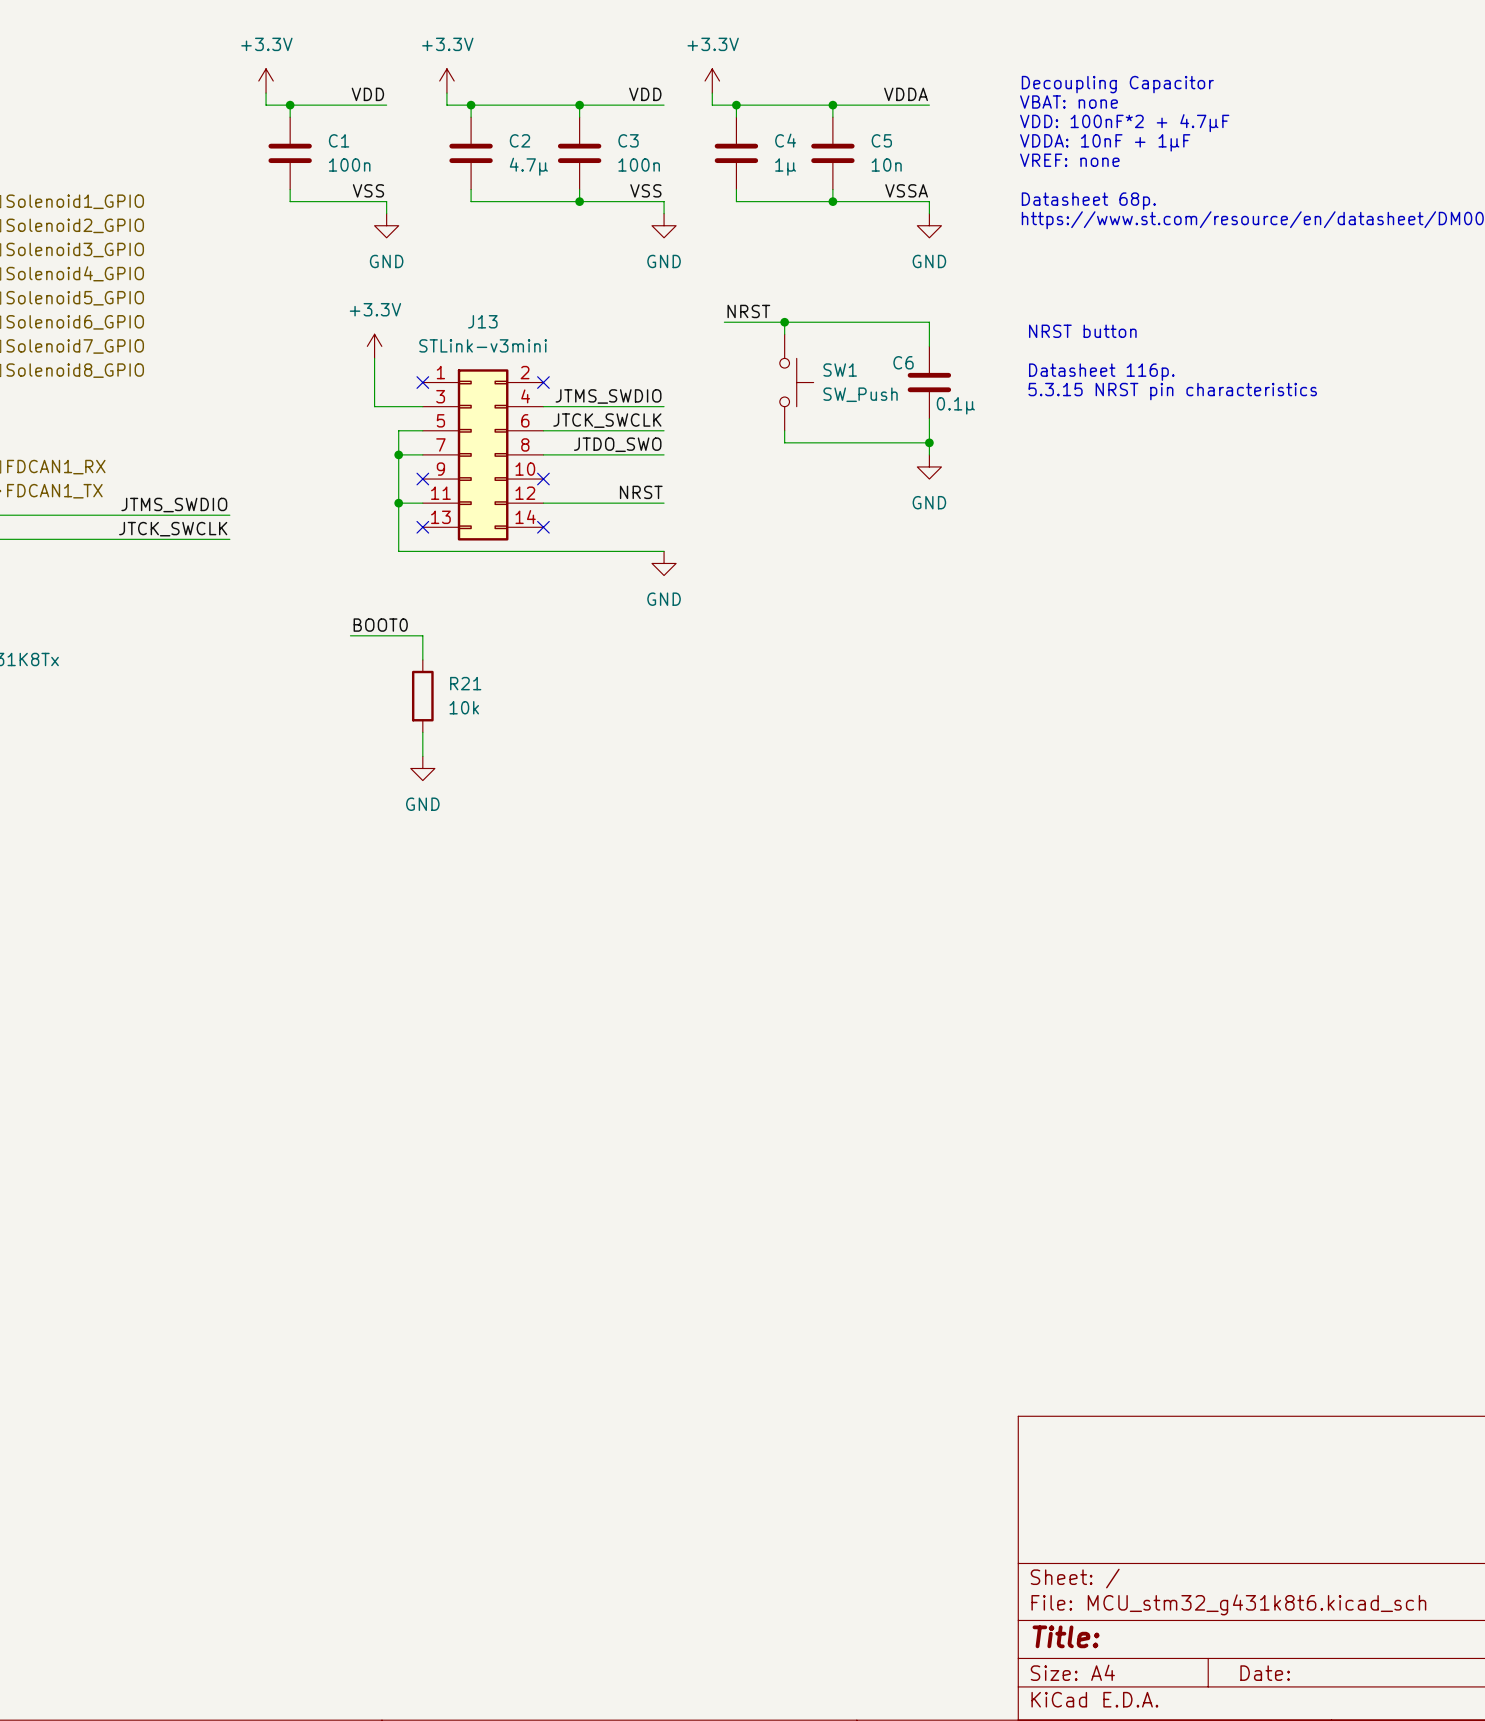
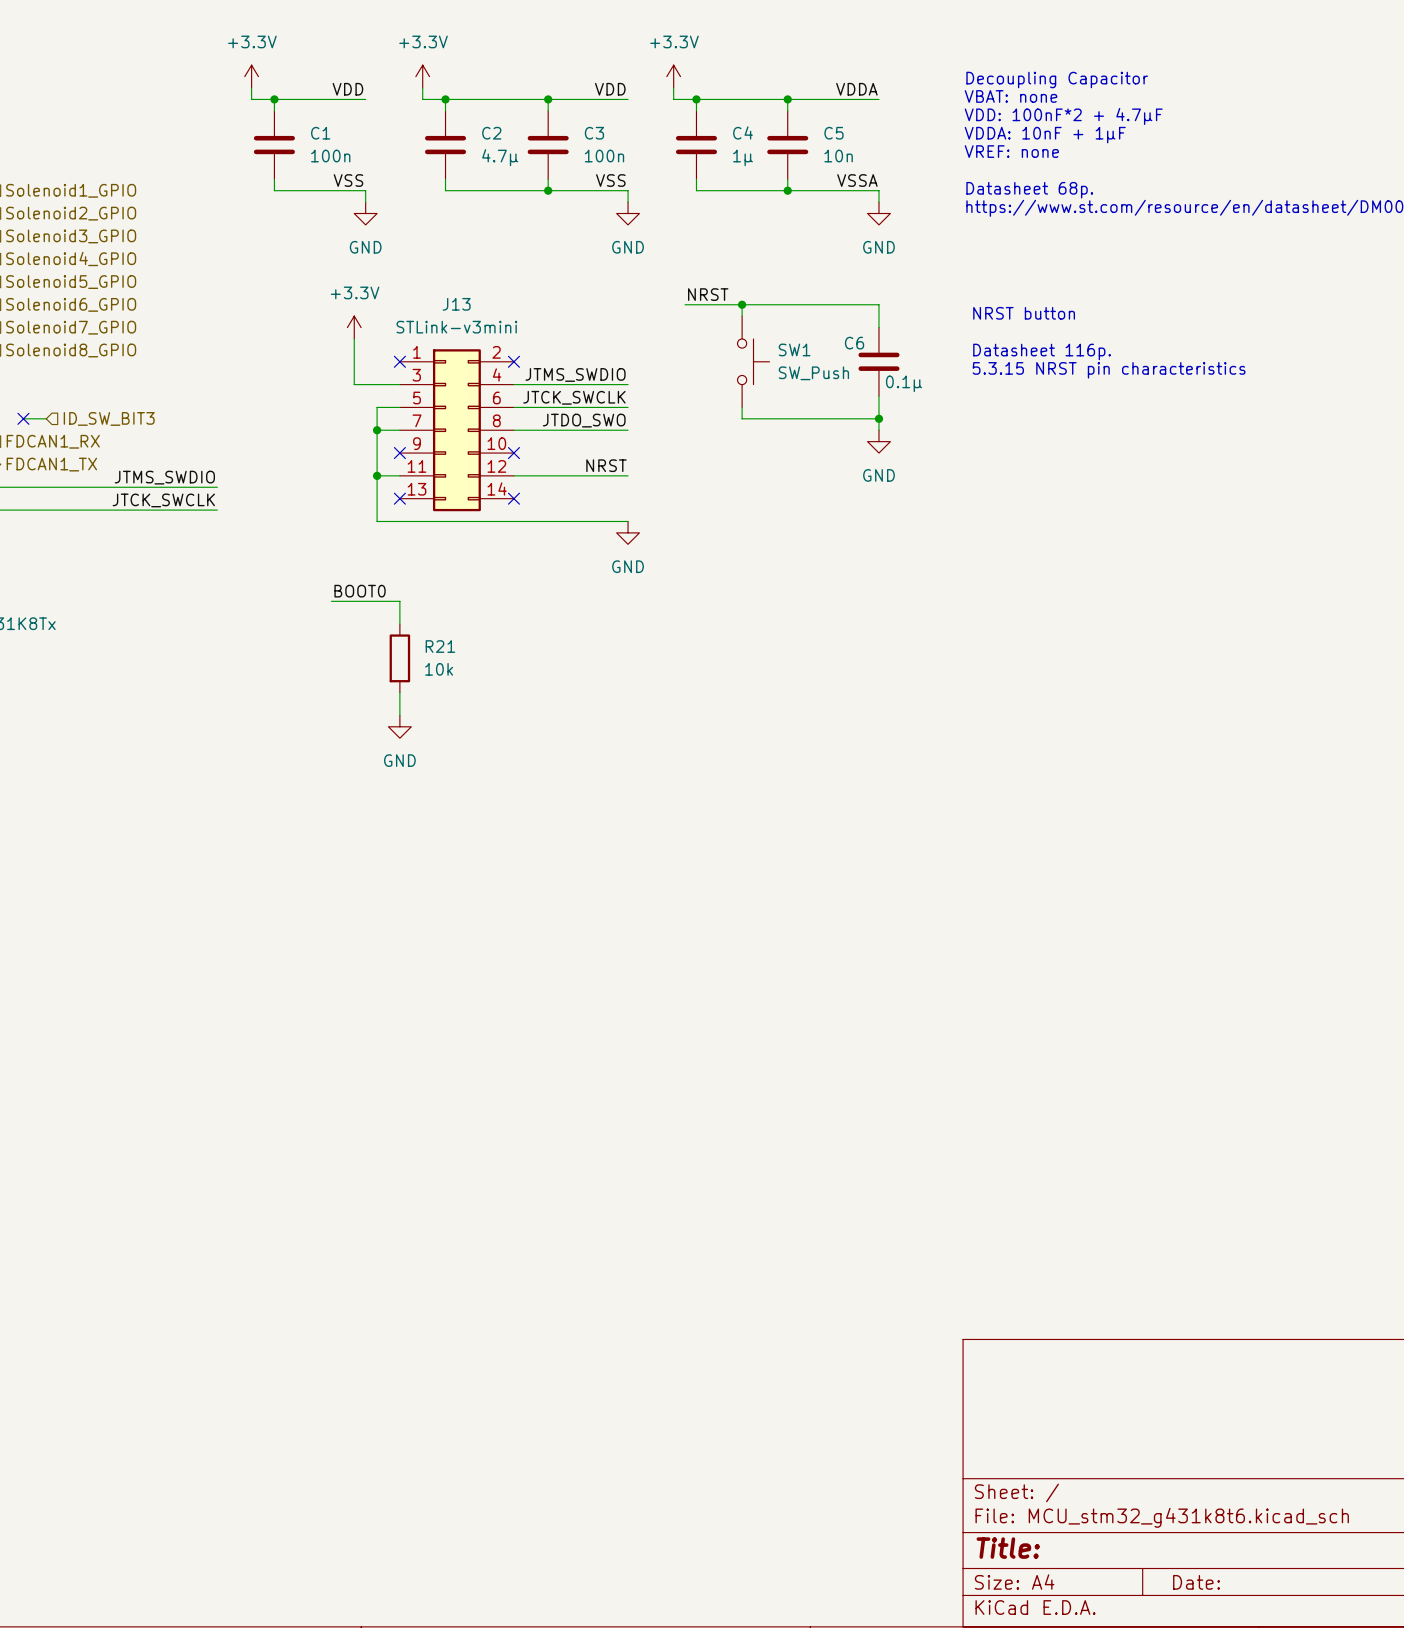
wire: none -> (23, 418) (46, 418)
no-connect mark: none -> (23, 418)
hierarchical label: none -> ID_SW_BIT3 (109, 418)

